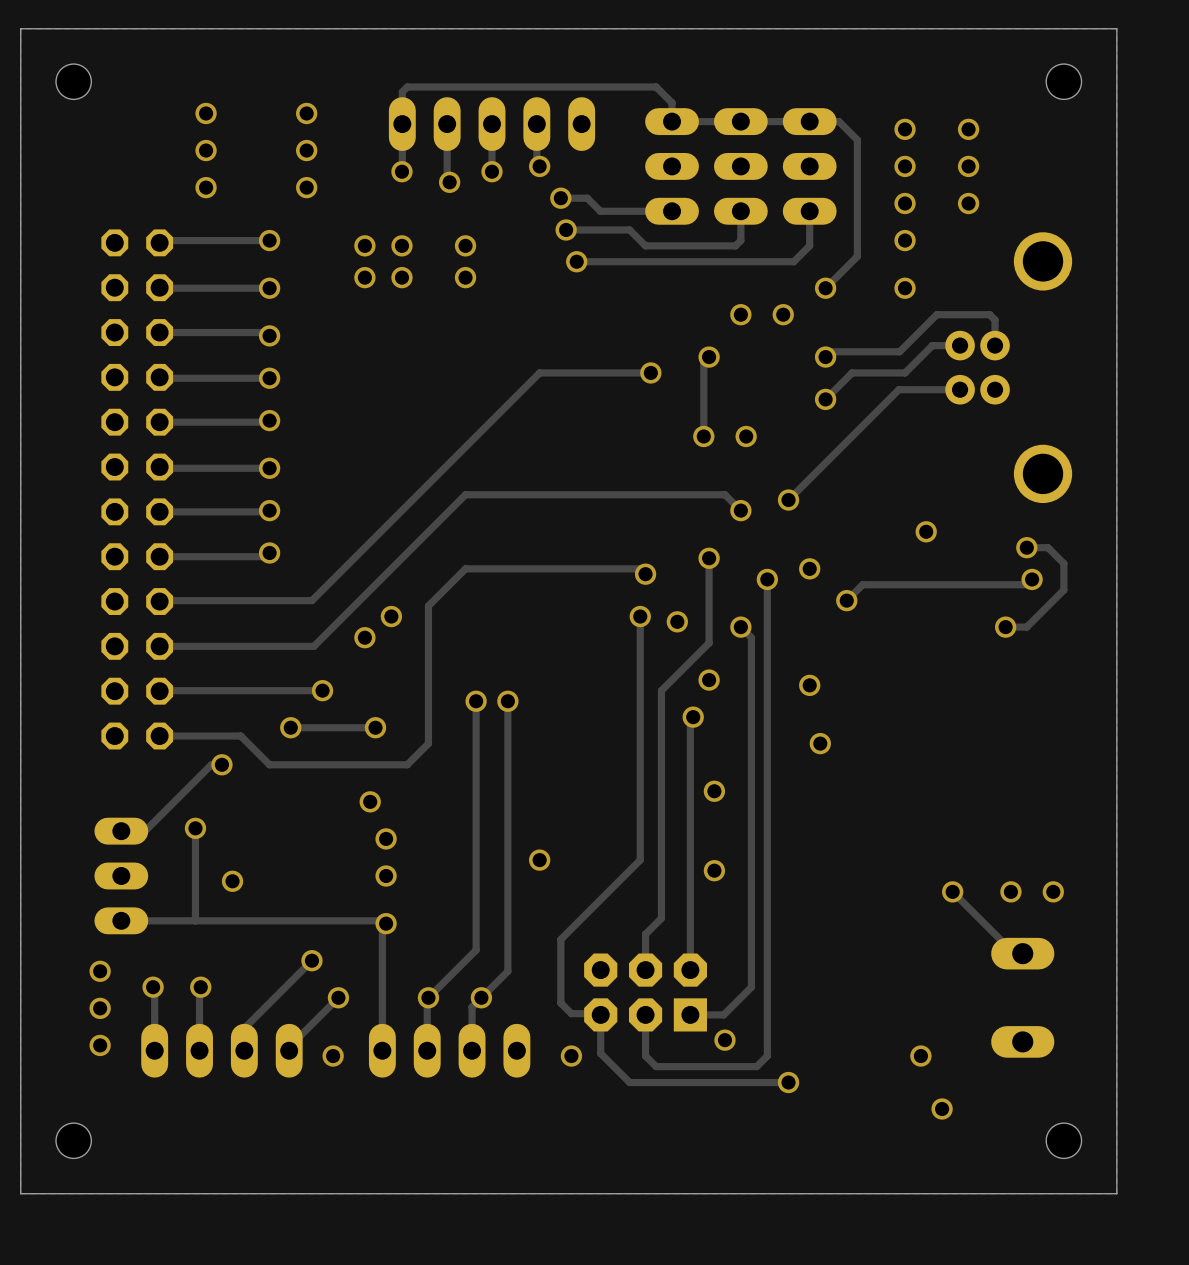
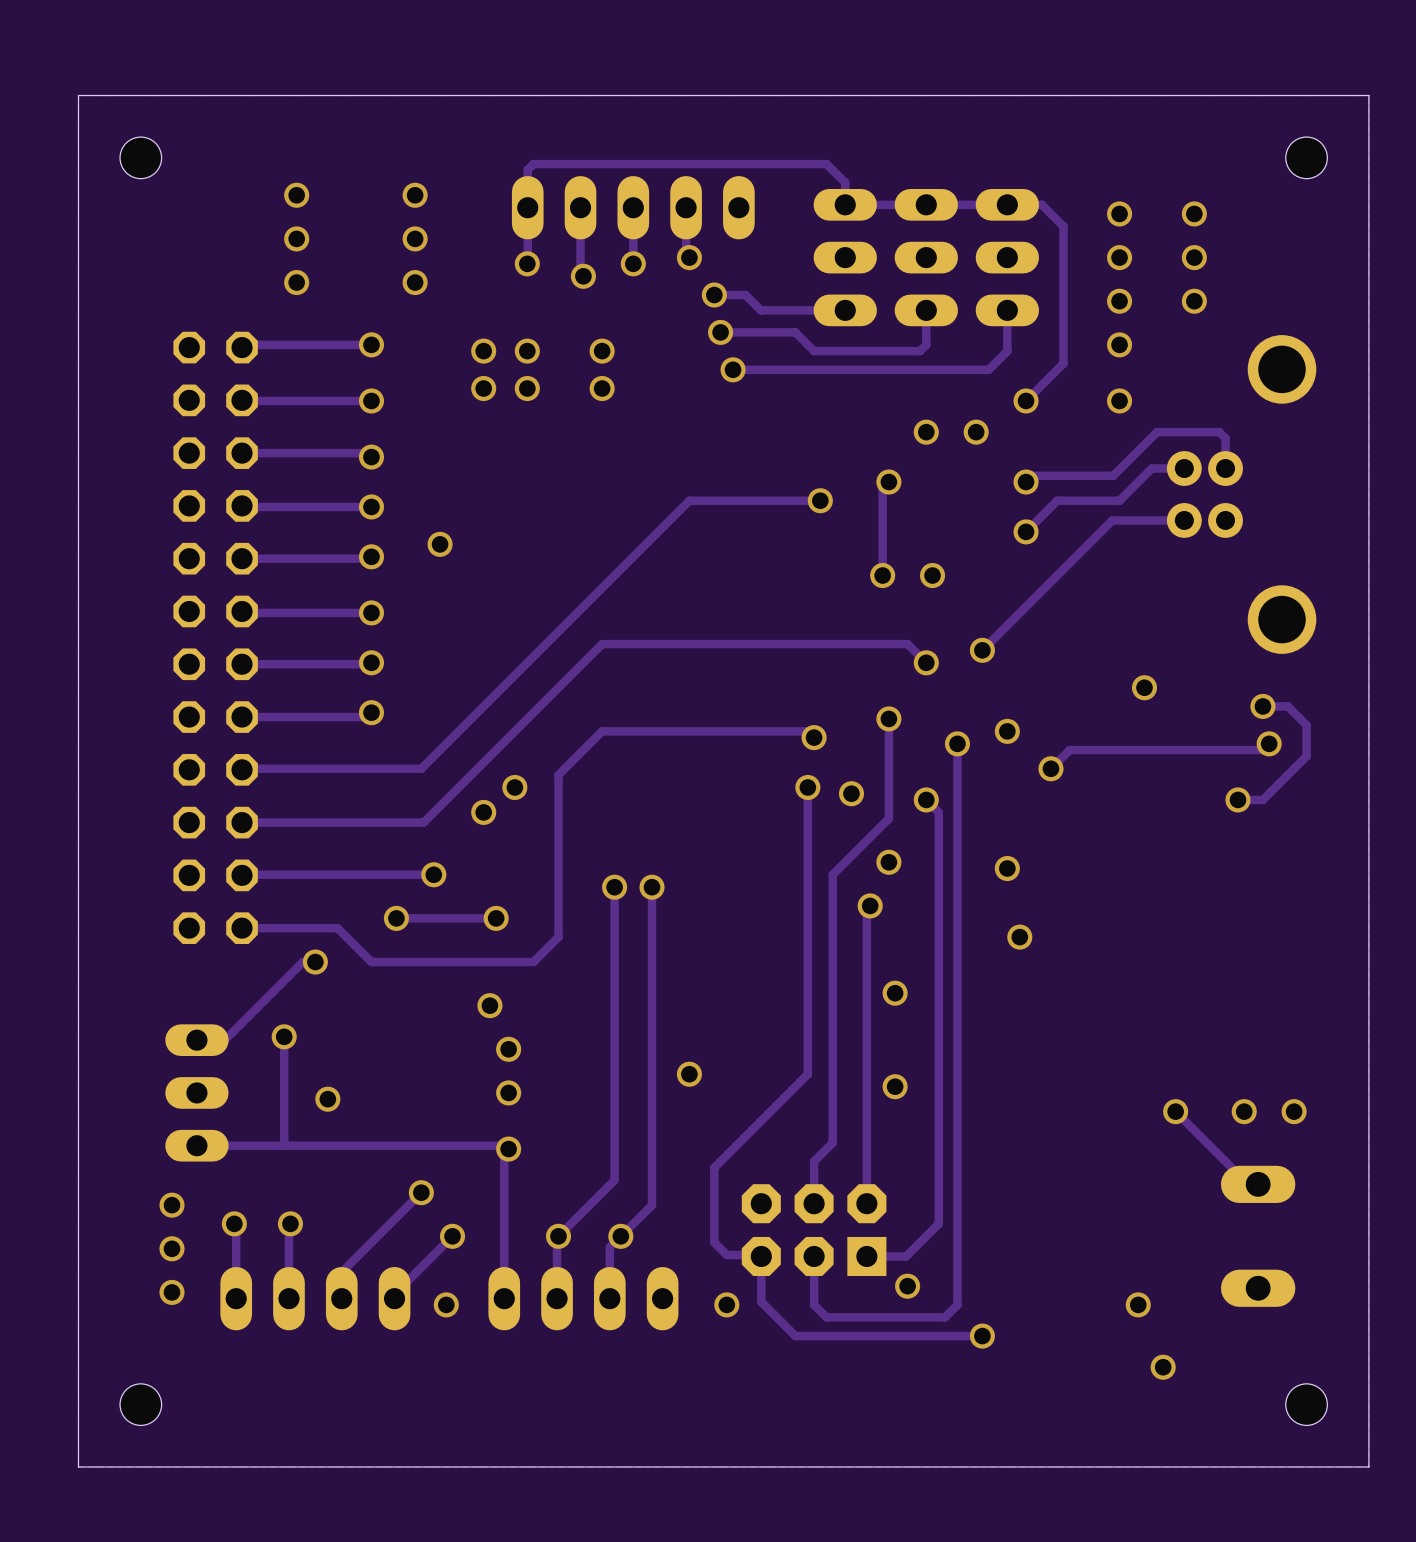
via: none -> (440, 544)

